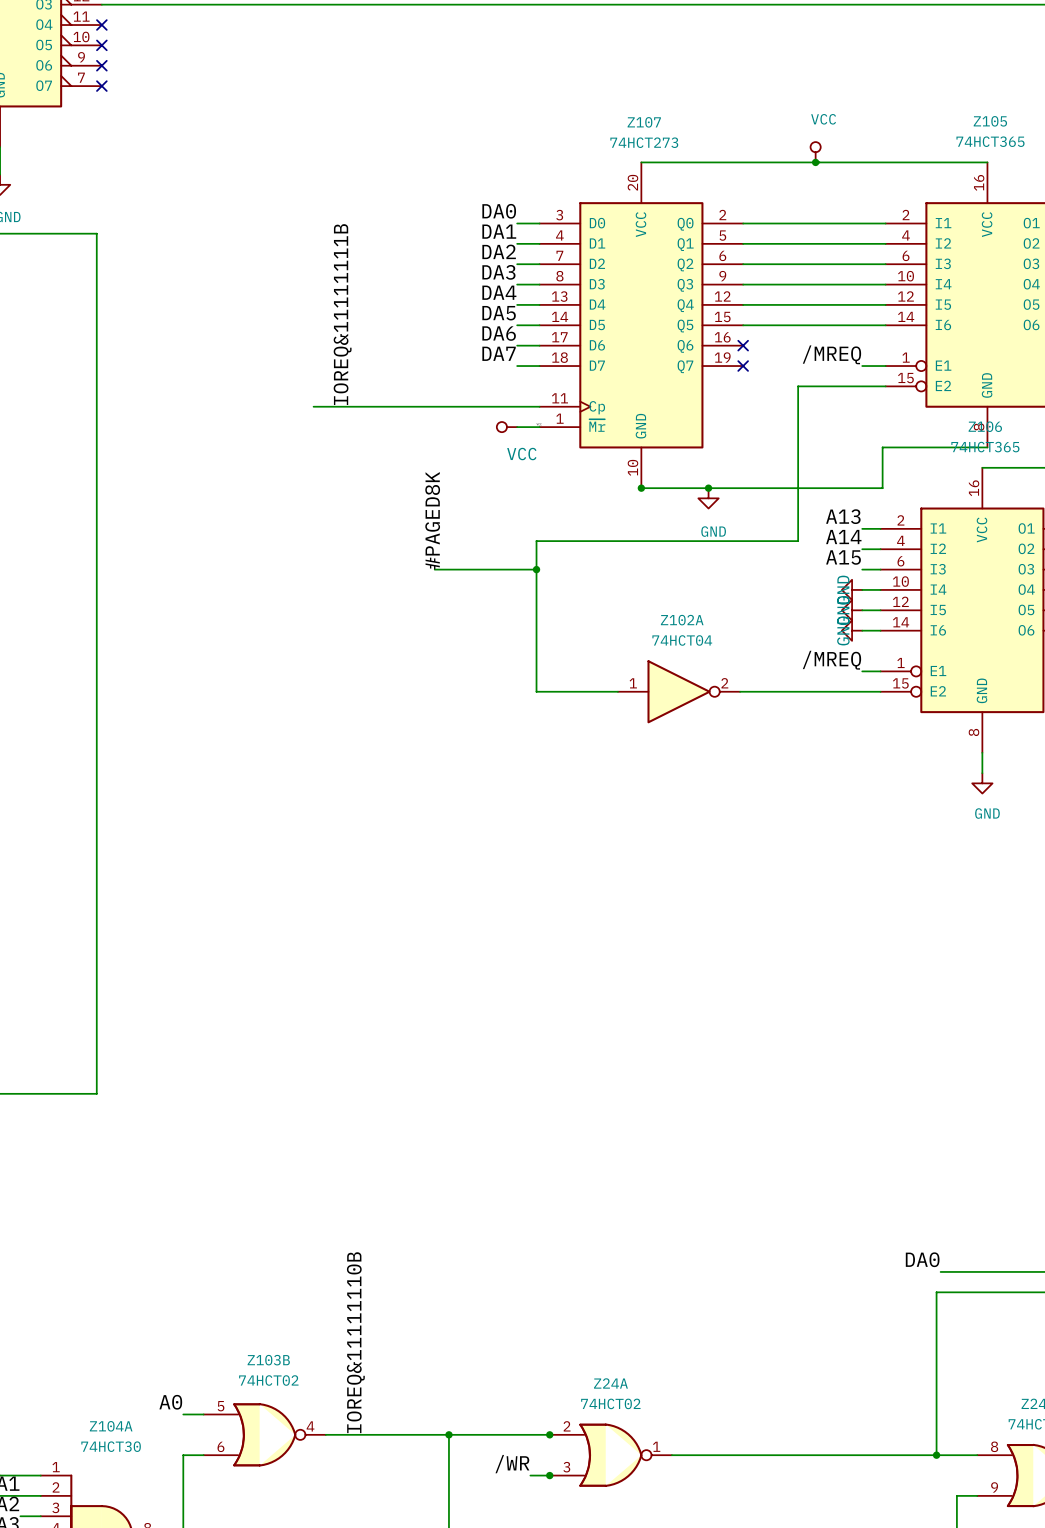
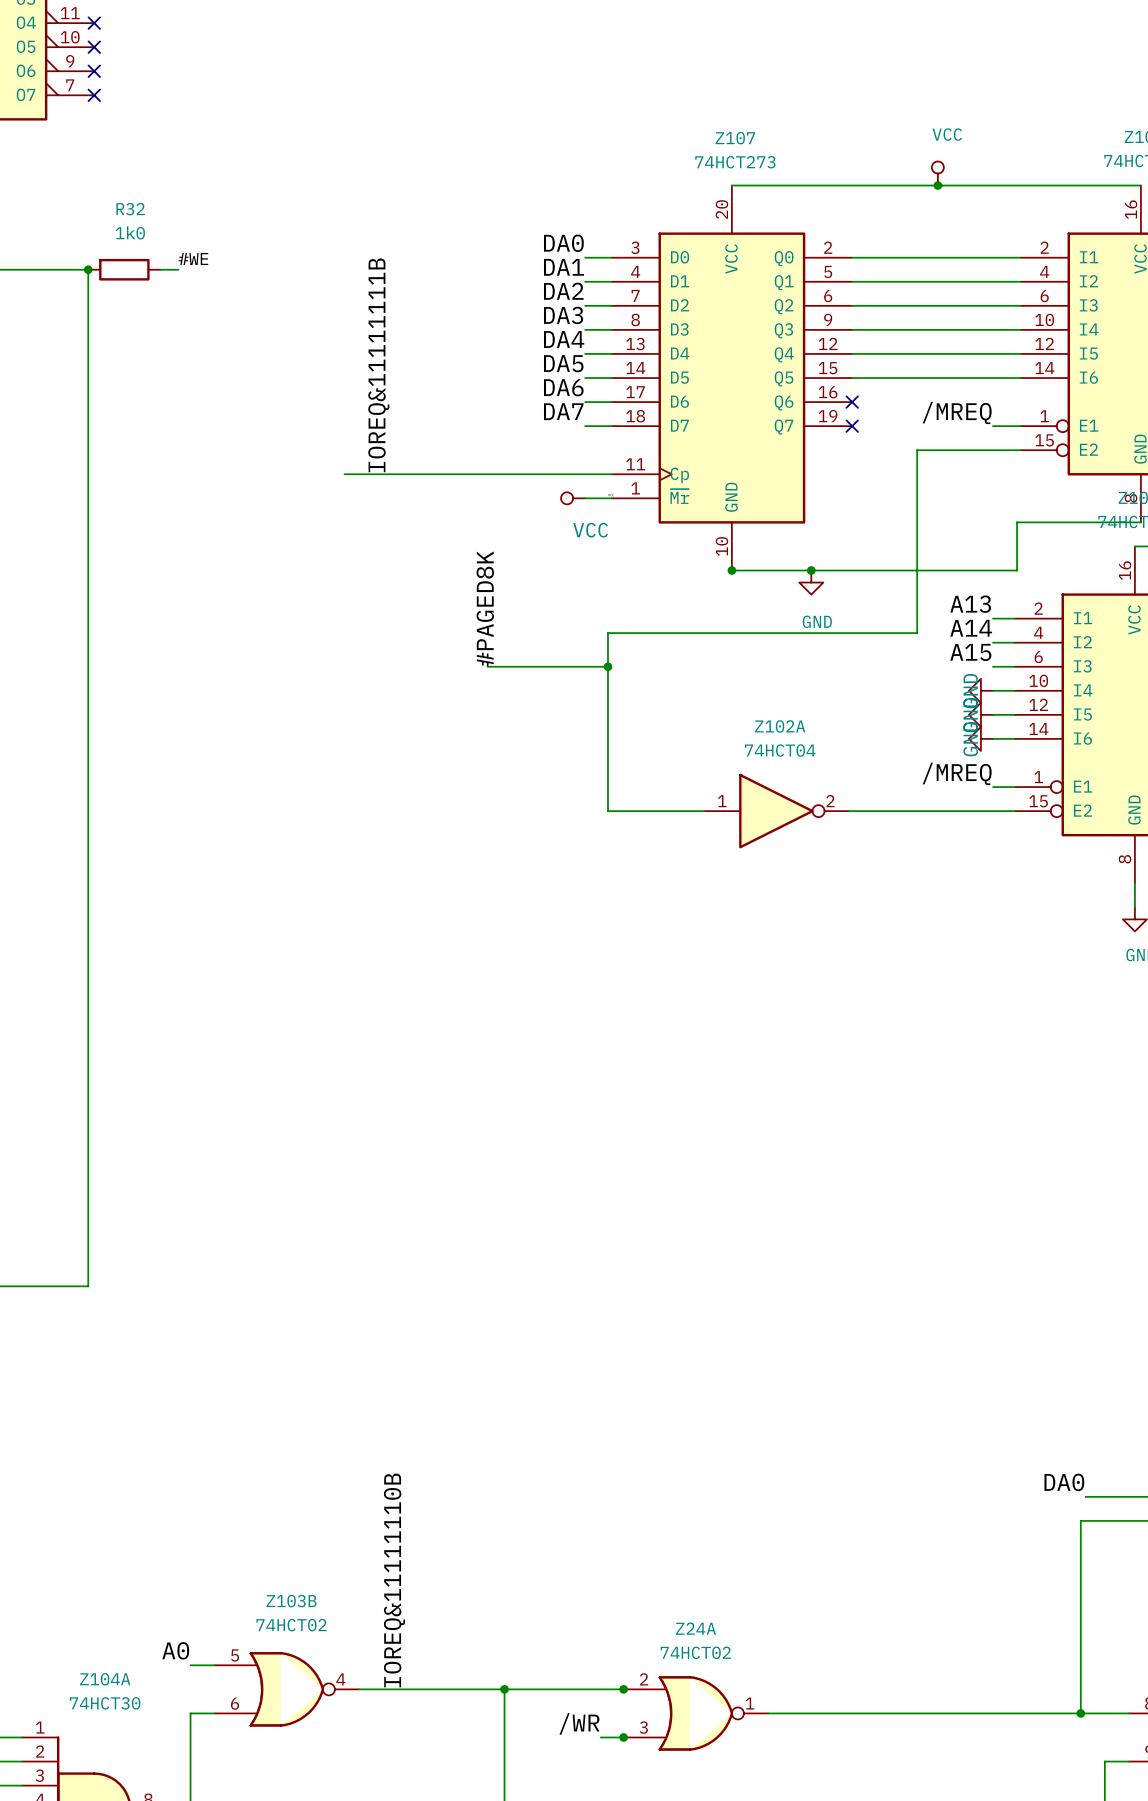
label: none -> #WE (193, 259)
junction: none -> (88, 269)
R32: none -> 1k0 (124, 269)
wire: none -> (160, 269) (178, 269)

